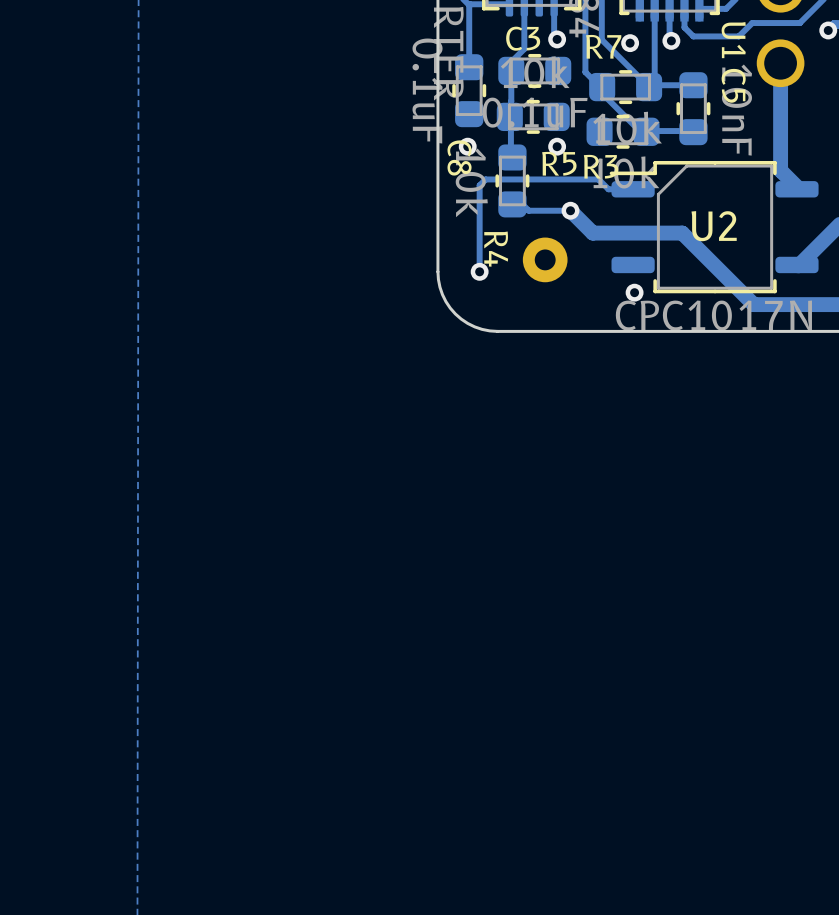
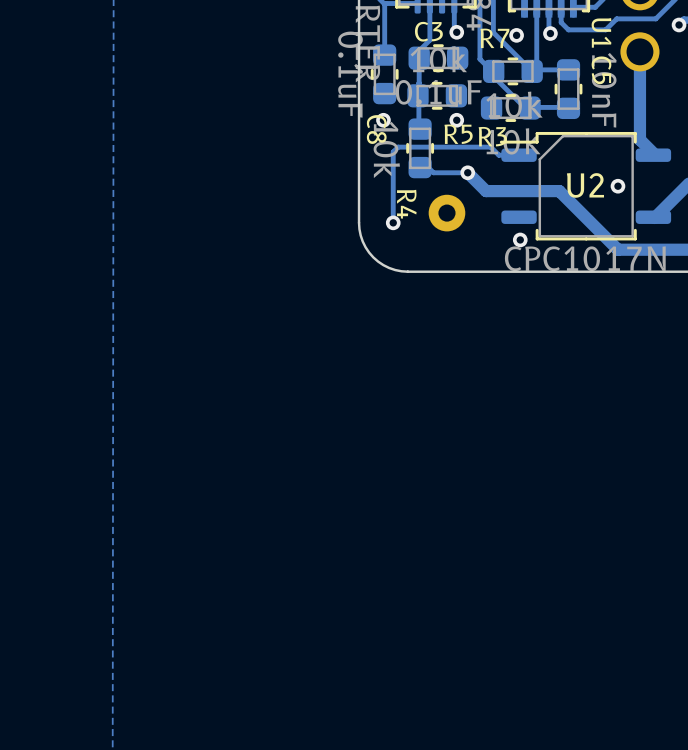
via: none -> (617, 186)

